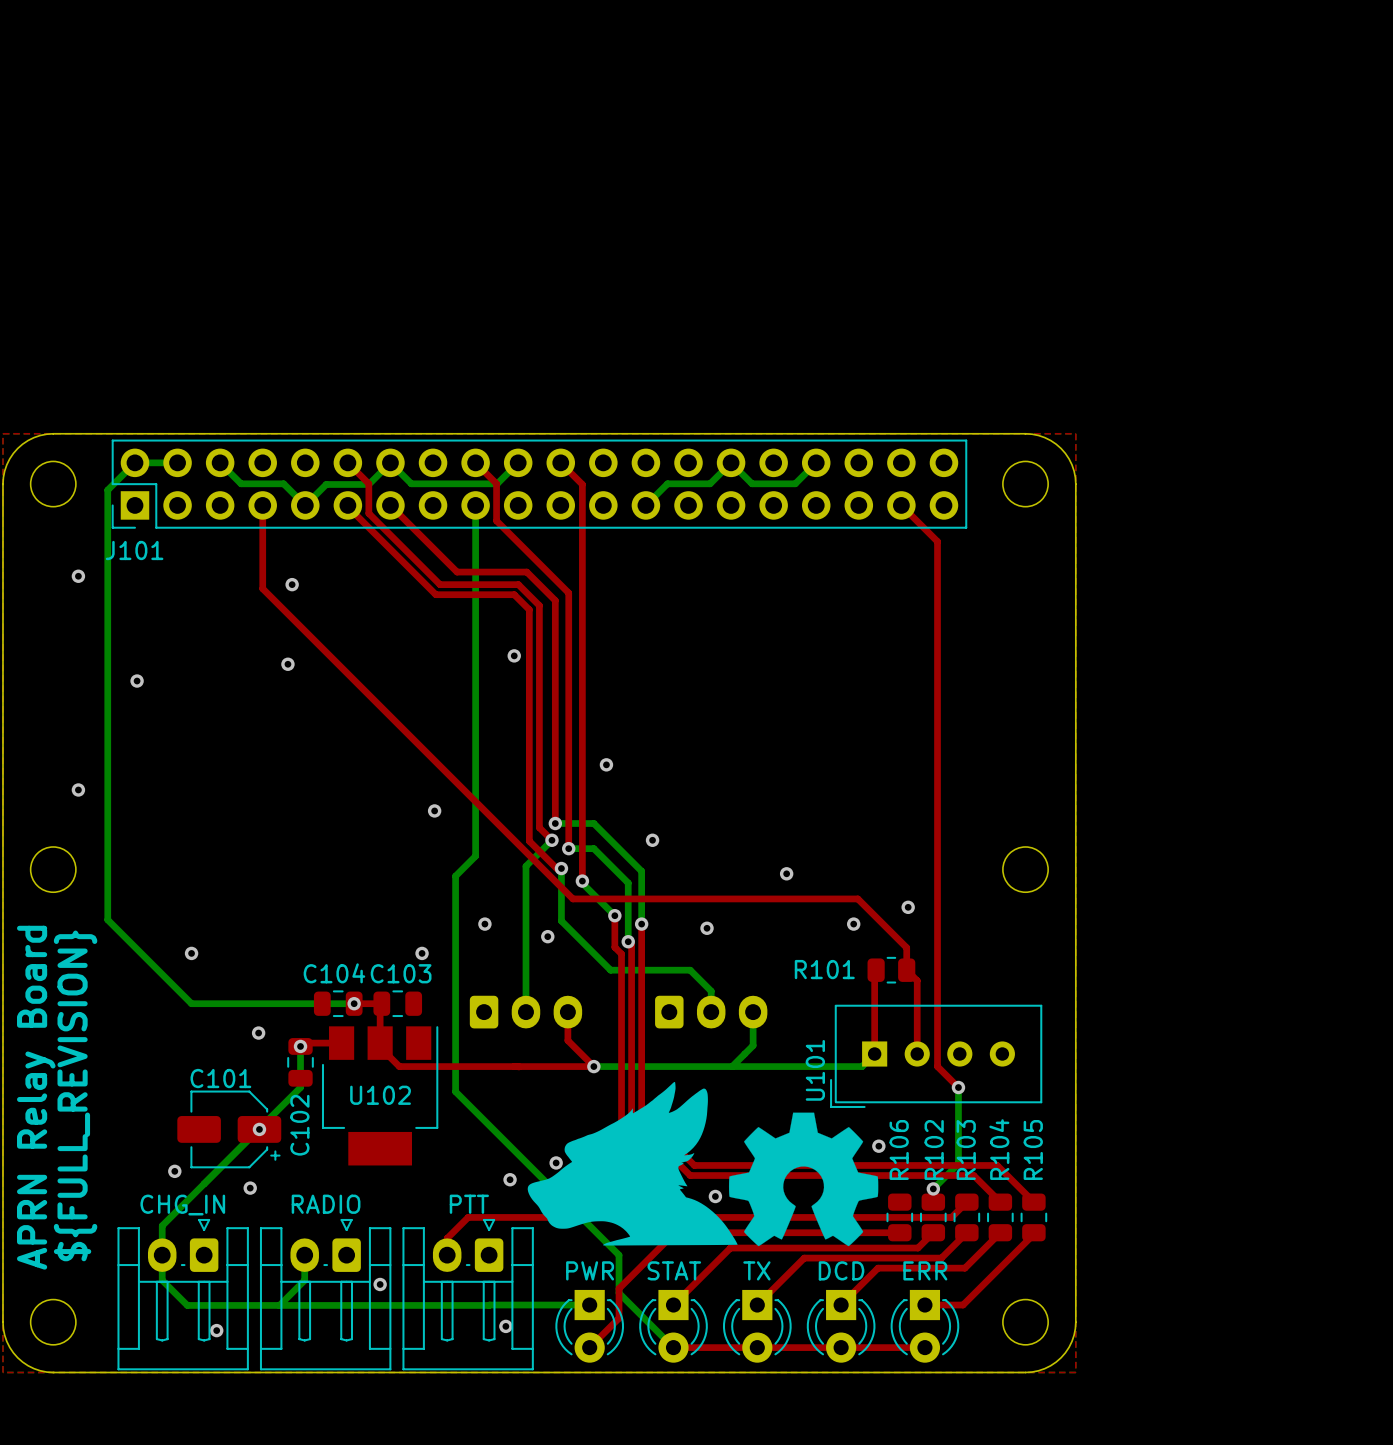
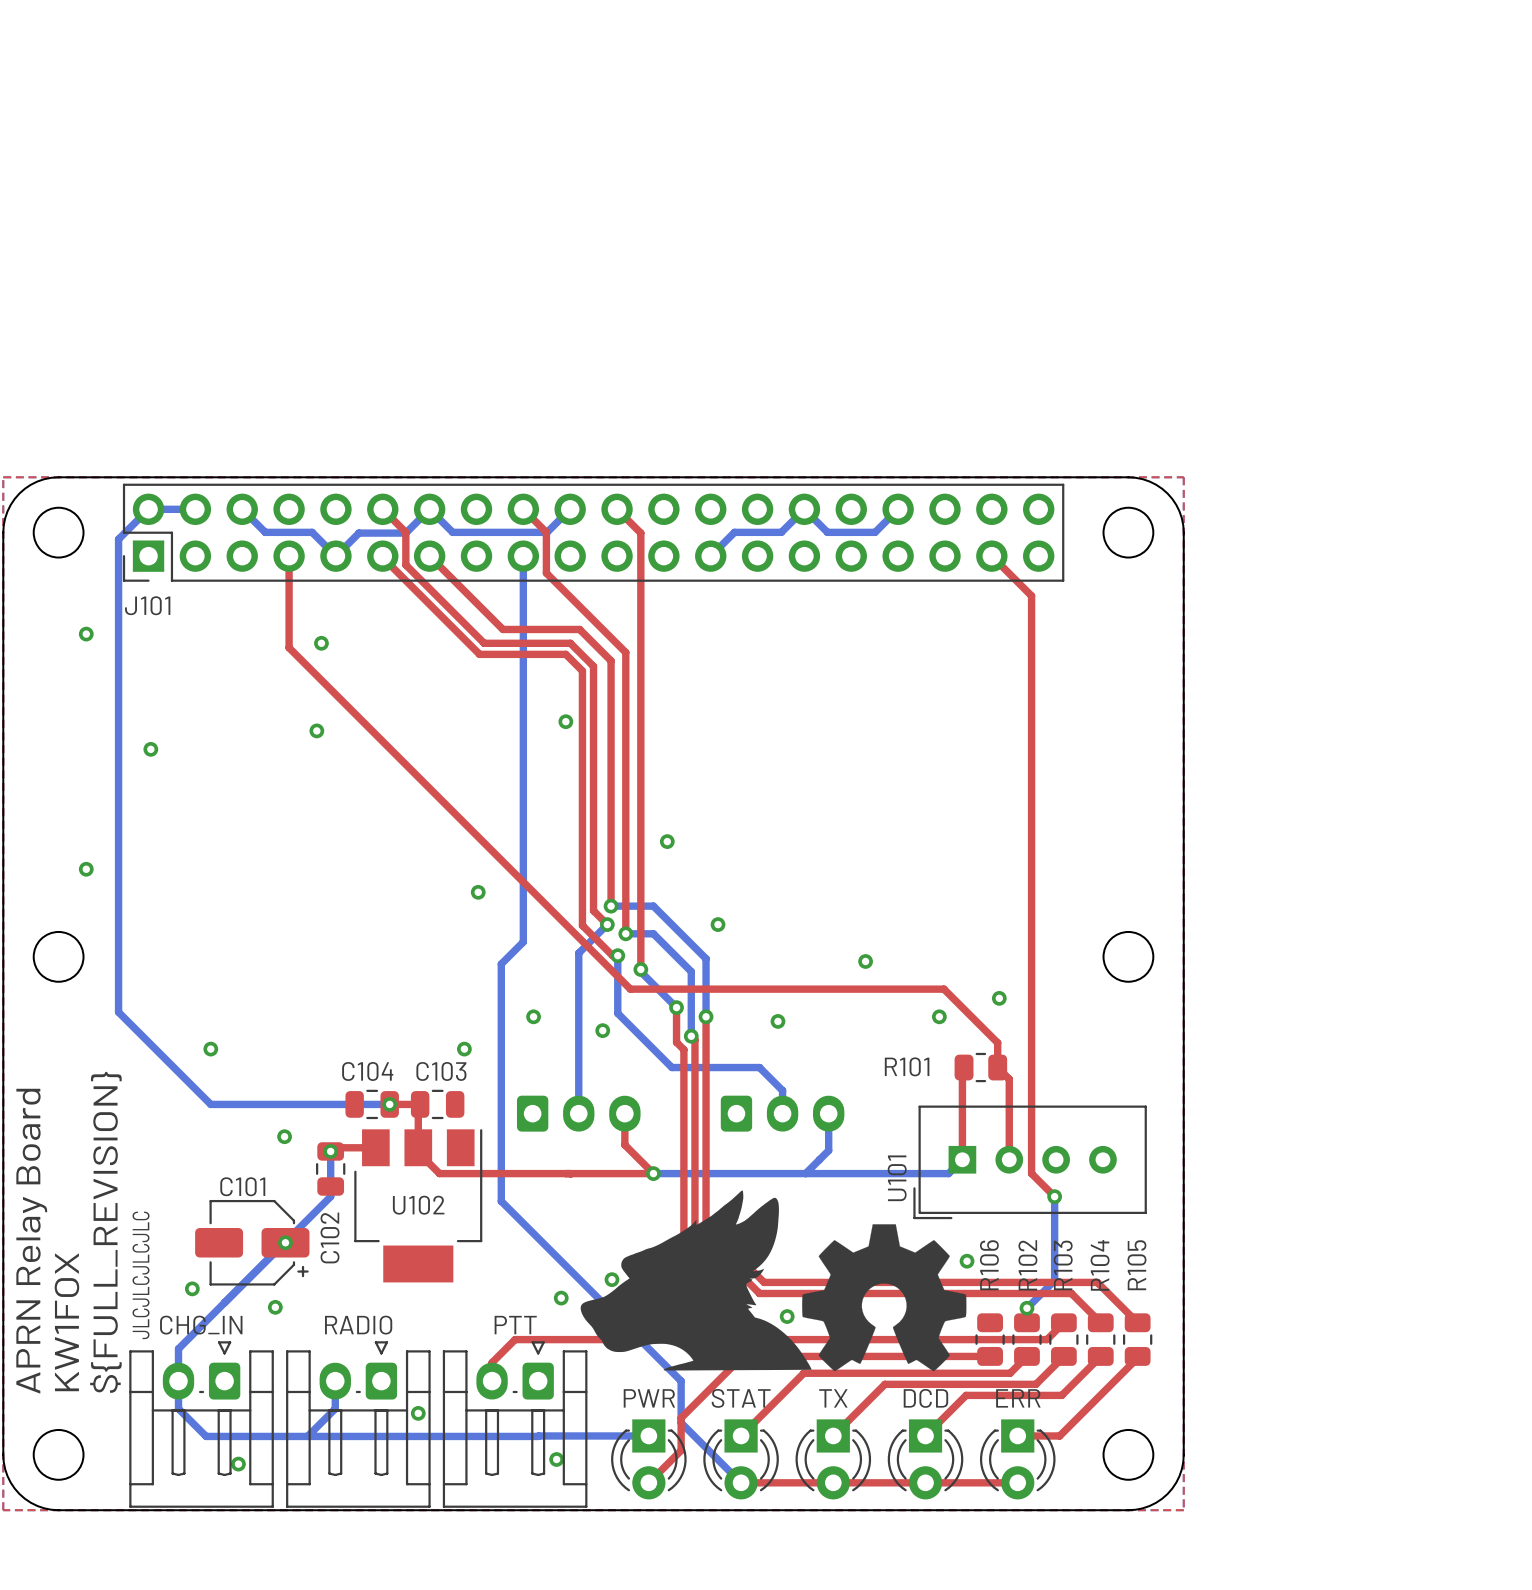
text position: ${FULL_REVISION} (75, 1095) -> ${FULL_REVISION} (105, 1232)
text position: APRN Relay Board (36, 1097) -> APRN Relay Board (31, 1241)
text: none -> JLCJLCJLCJLC (141, 1275)
text: none -> KW1FOX (66, 1322)

